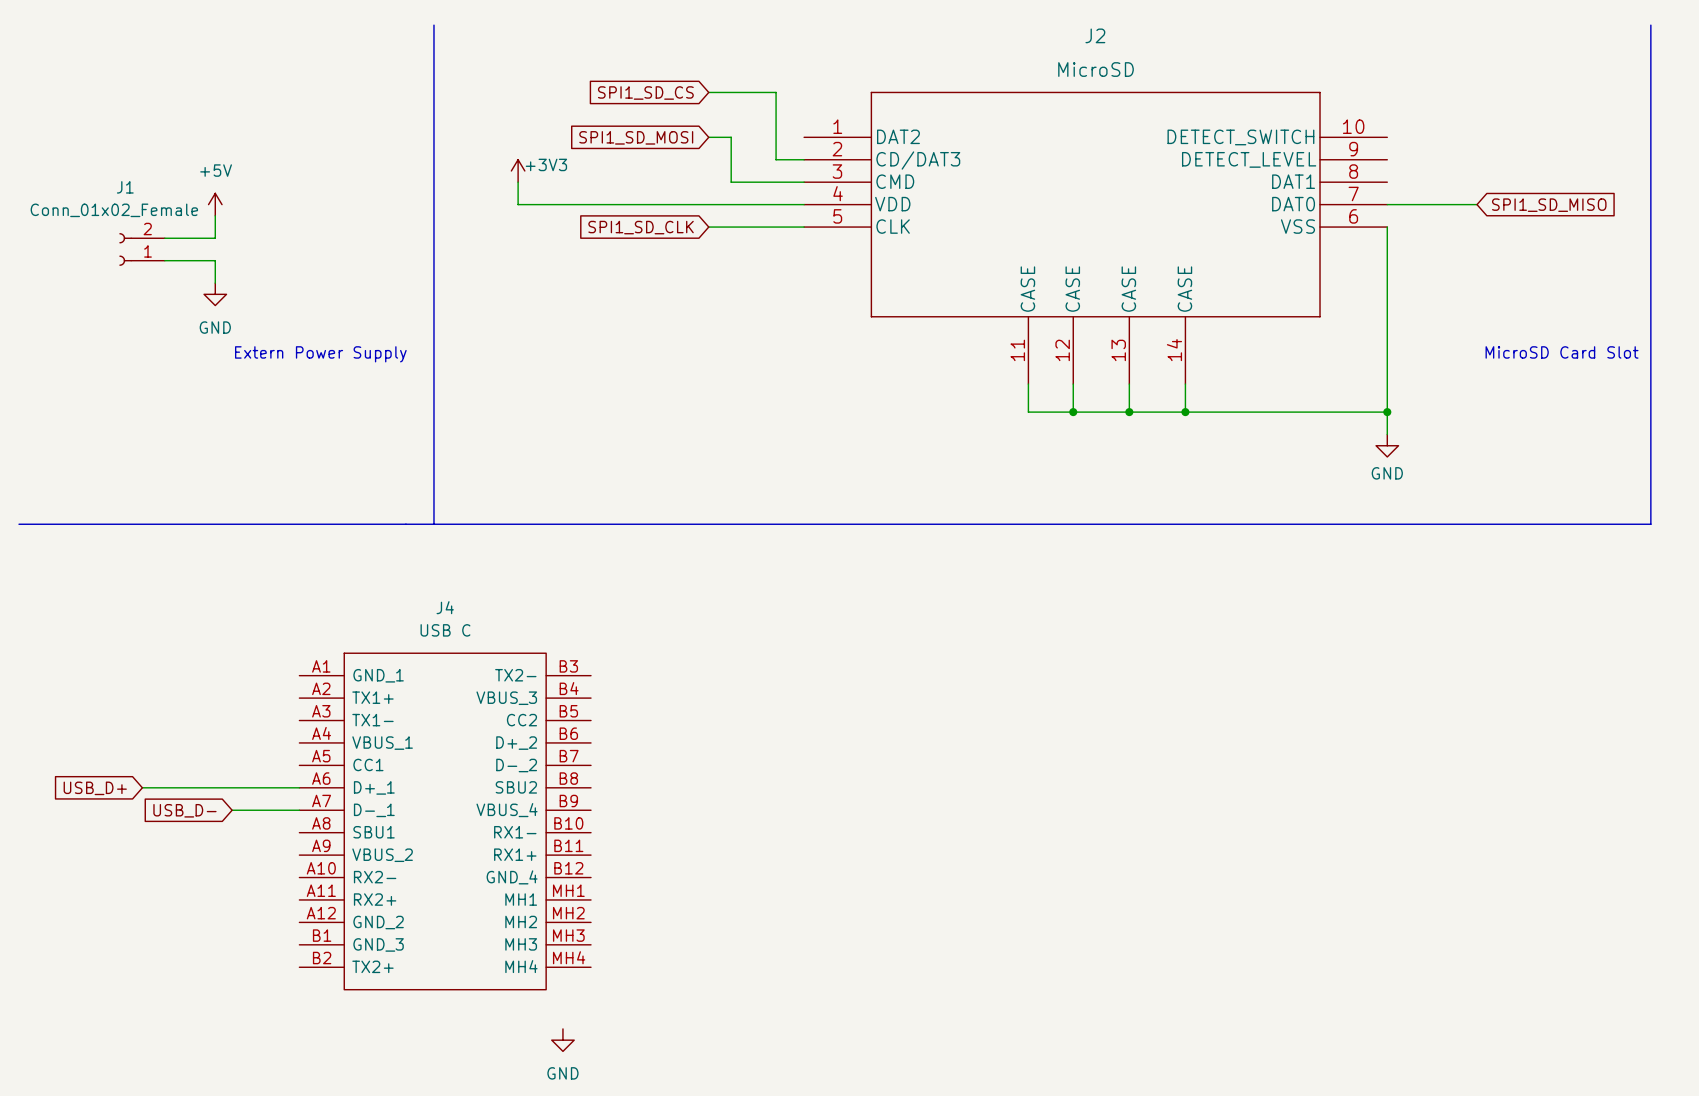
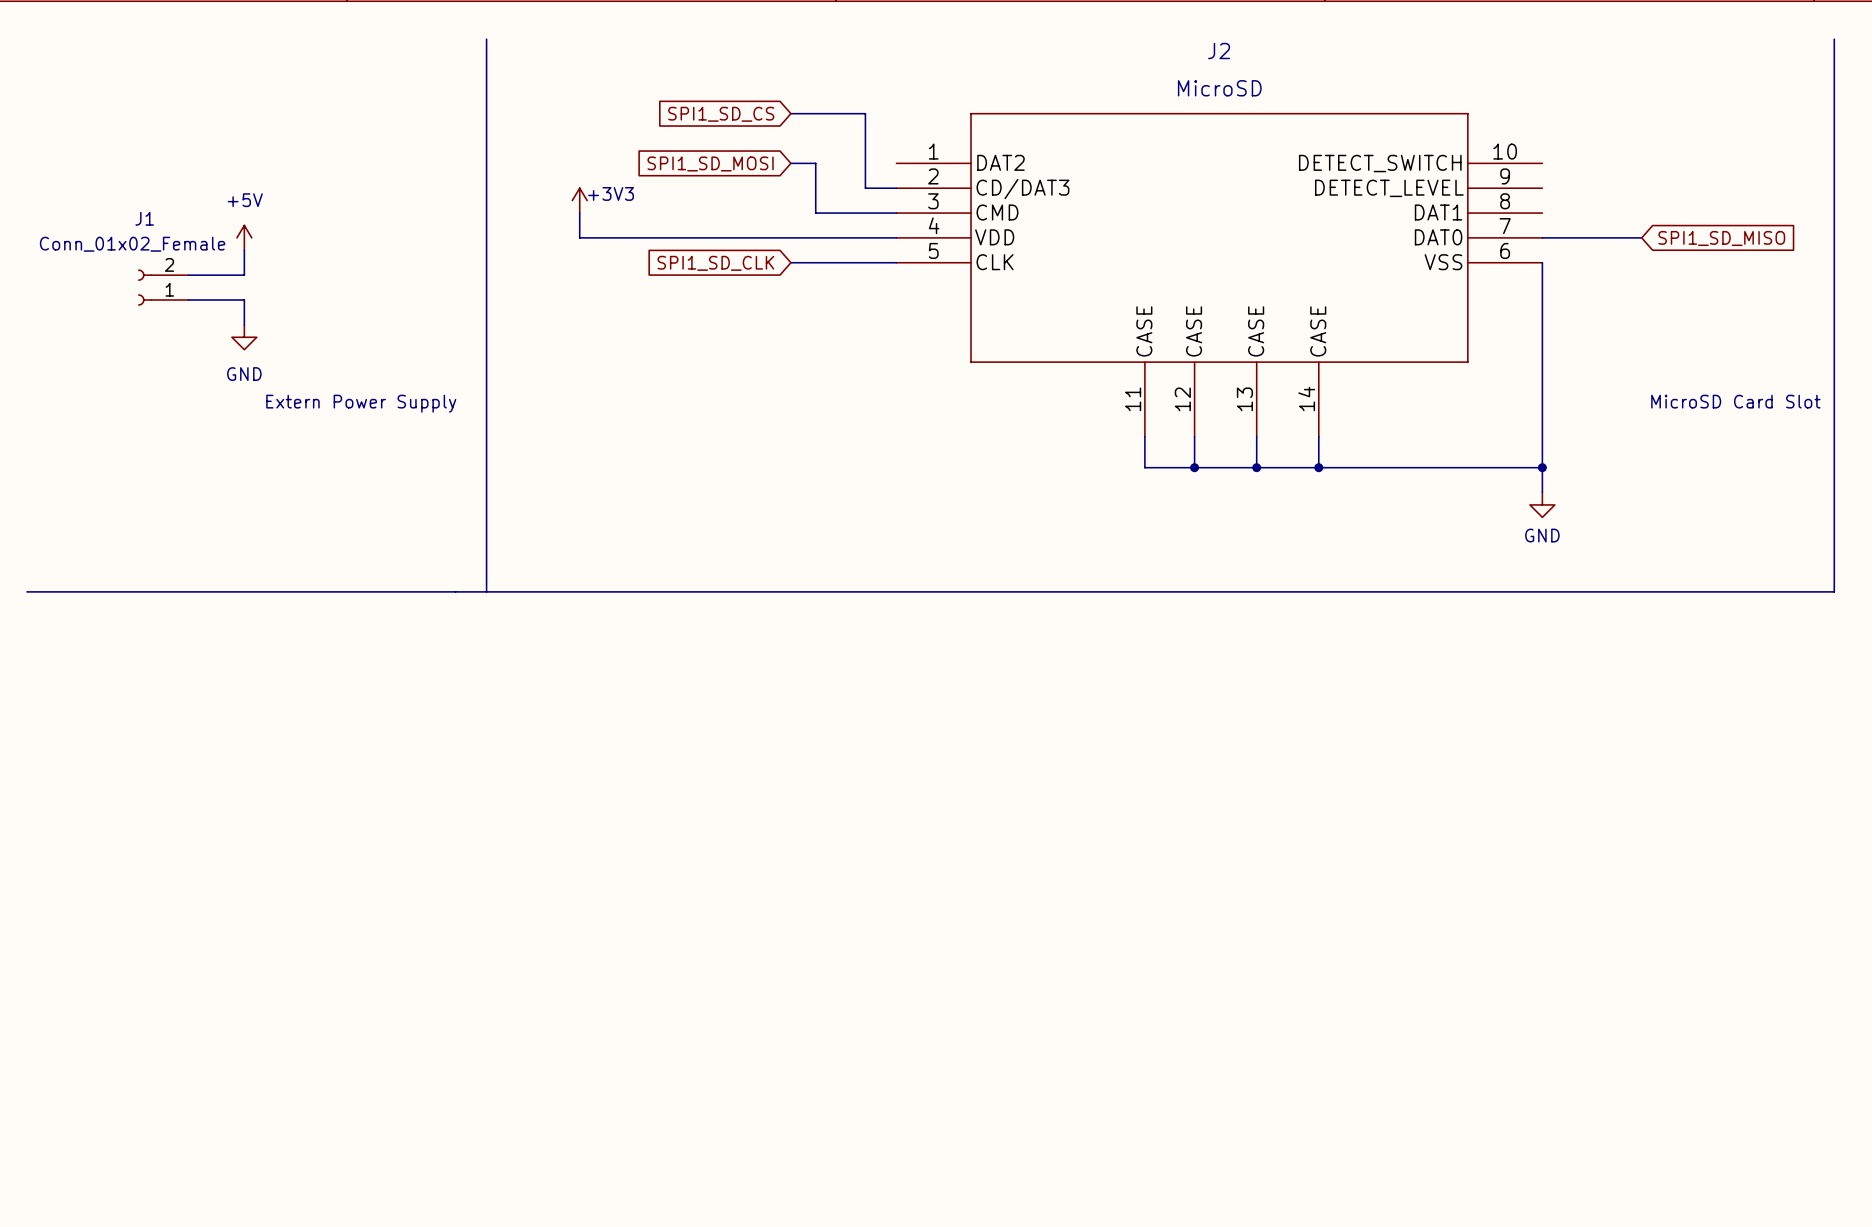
wire: (142, 787) (299, 787) -> none
global label: USB_D+ (95, 788) -> none
global label: USB_D- (184, 810) -> none
wire: (232, 810) (299, 810) -> none
J4: USB C (445, 821) -> none
power symbol: GND (562, 1040) -> none

